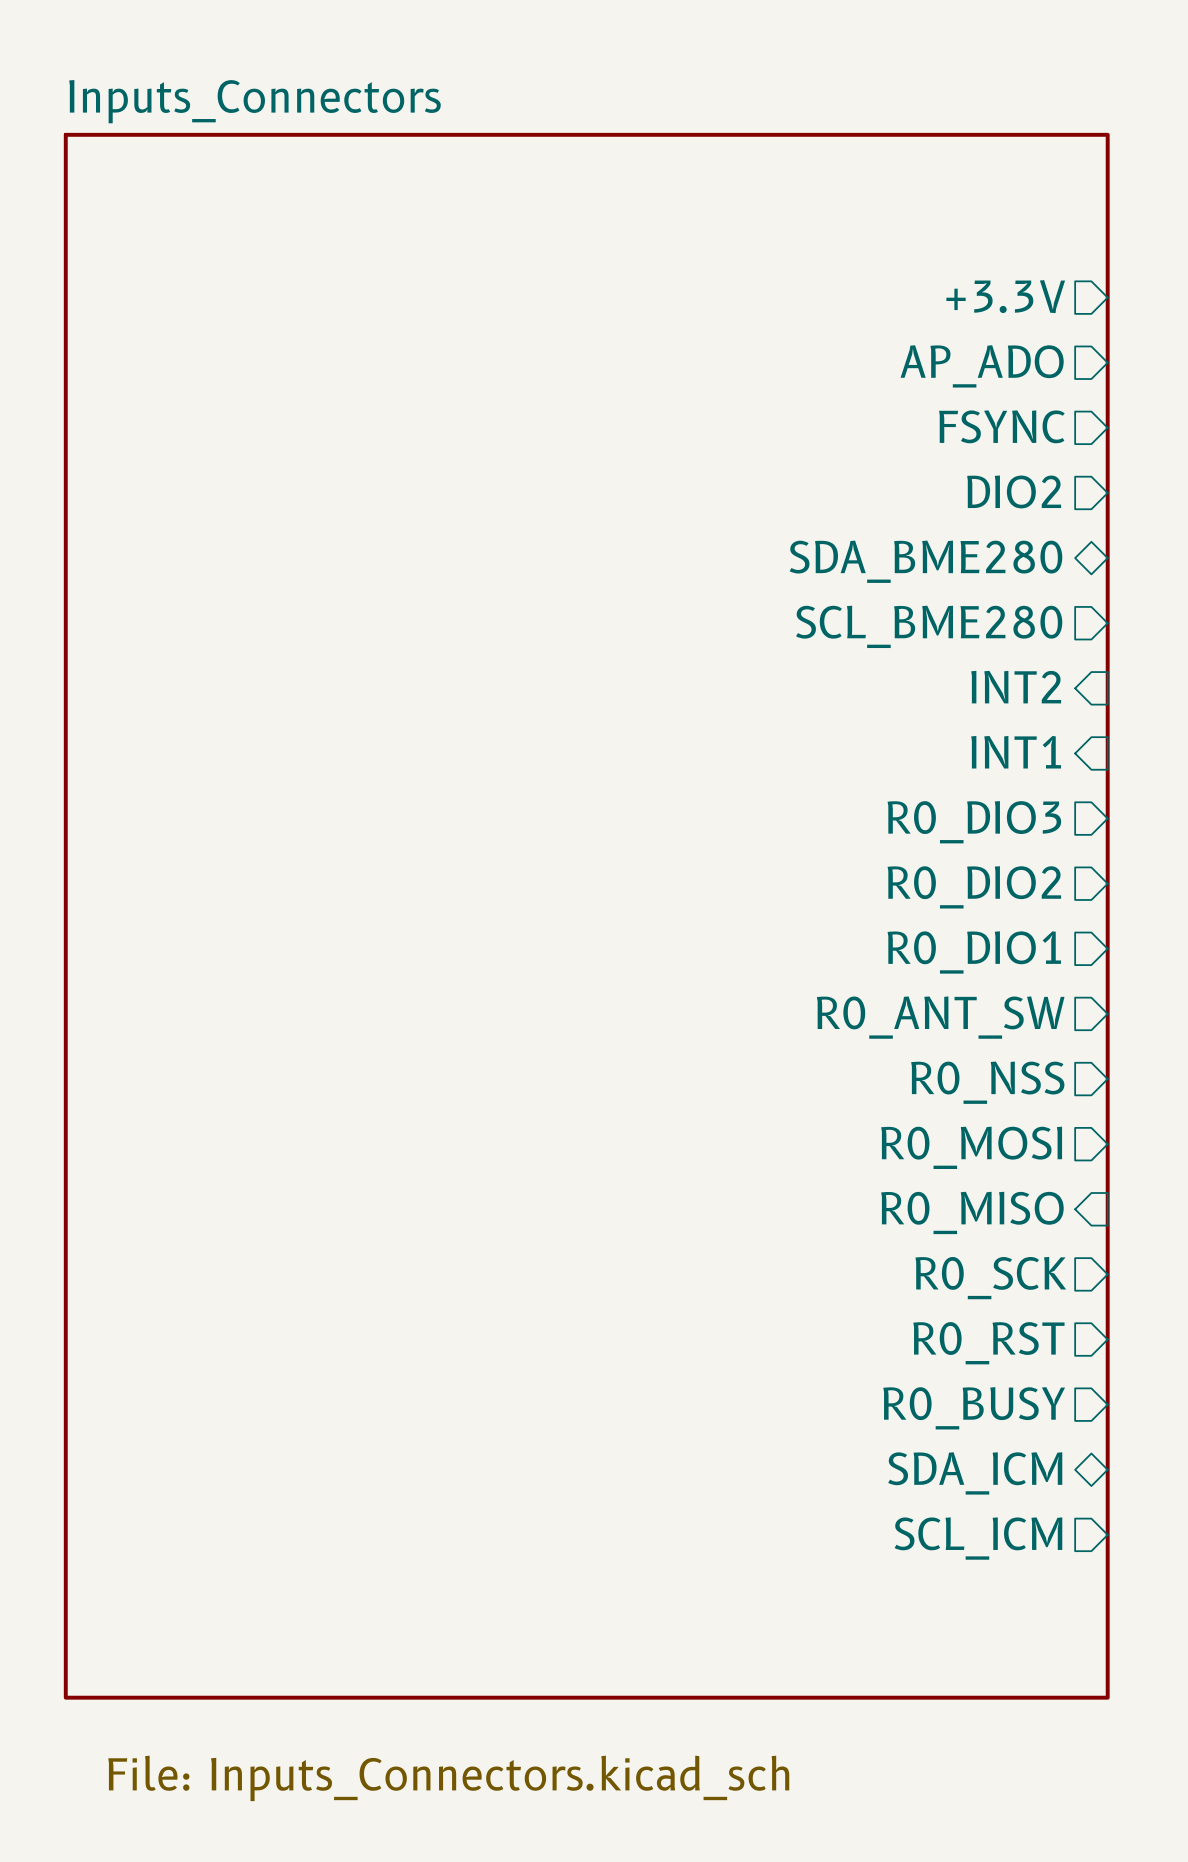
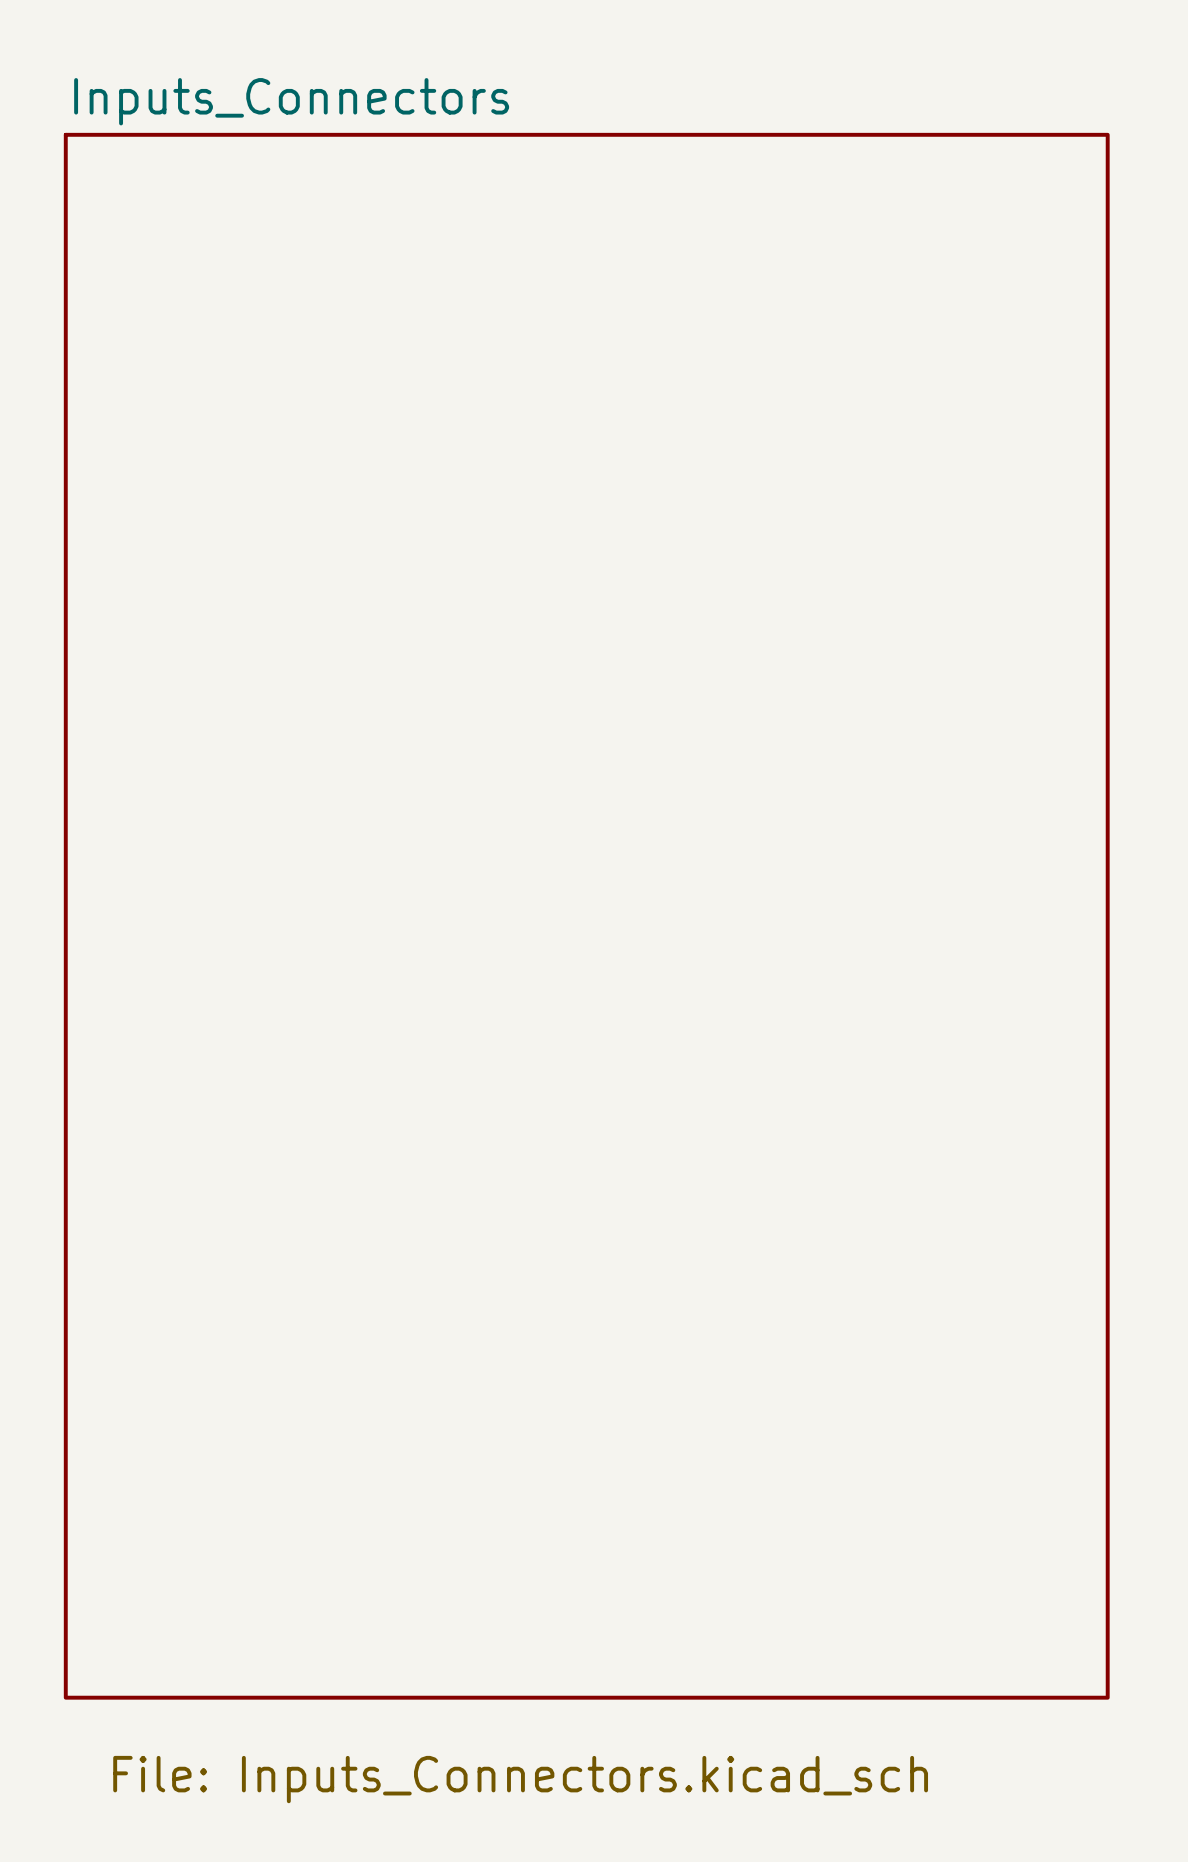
sheet pin: +3.3V (1005, 296) -> none
sheet pin: AP_ADO (982, 366) -> none
sheet pin: FSYNC (1001, 426) -> none
sheet pin: DIO2 (1014, 491) -> none
sheet pin: SDA_BME280 (925, 561) -> none
sheet pin: SCL_BME280 (929, 626) -> none
sheet pin: INT2 (1016, 687) -> none
sheet pin: INT1 (1016, 752) -> none
sheet pin: R0_DIO3 (974, 822) -> none
sheet pin: R0_DIO2 (974, 887) -> none
sheet pin: R0_DIO1 (974, 952) -> none
sheet pin: R0_ANT_SW (940, 1017) -> none
sheet pin: R0_NSS (987, 1082) -> none
sheet pin: R0_MOSI (971, 1147) -> none
sheet pin: R0_MISO (972, 1212) -> none
sheet pin: R0_SCK (990, 1278) -> none
sheet pin: R0_RST (988, 1343) -> none
sheet pin: R0_BUSY (974, 1408) -> none
sheet pin: SDA_ICM (975, 1473) -> none
sheet pin: SCL_ICM (978, 1538) -> none

